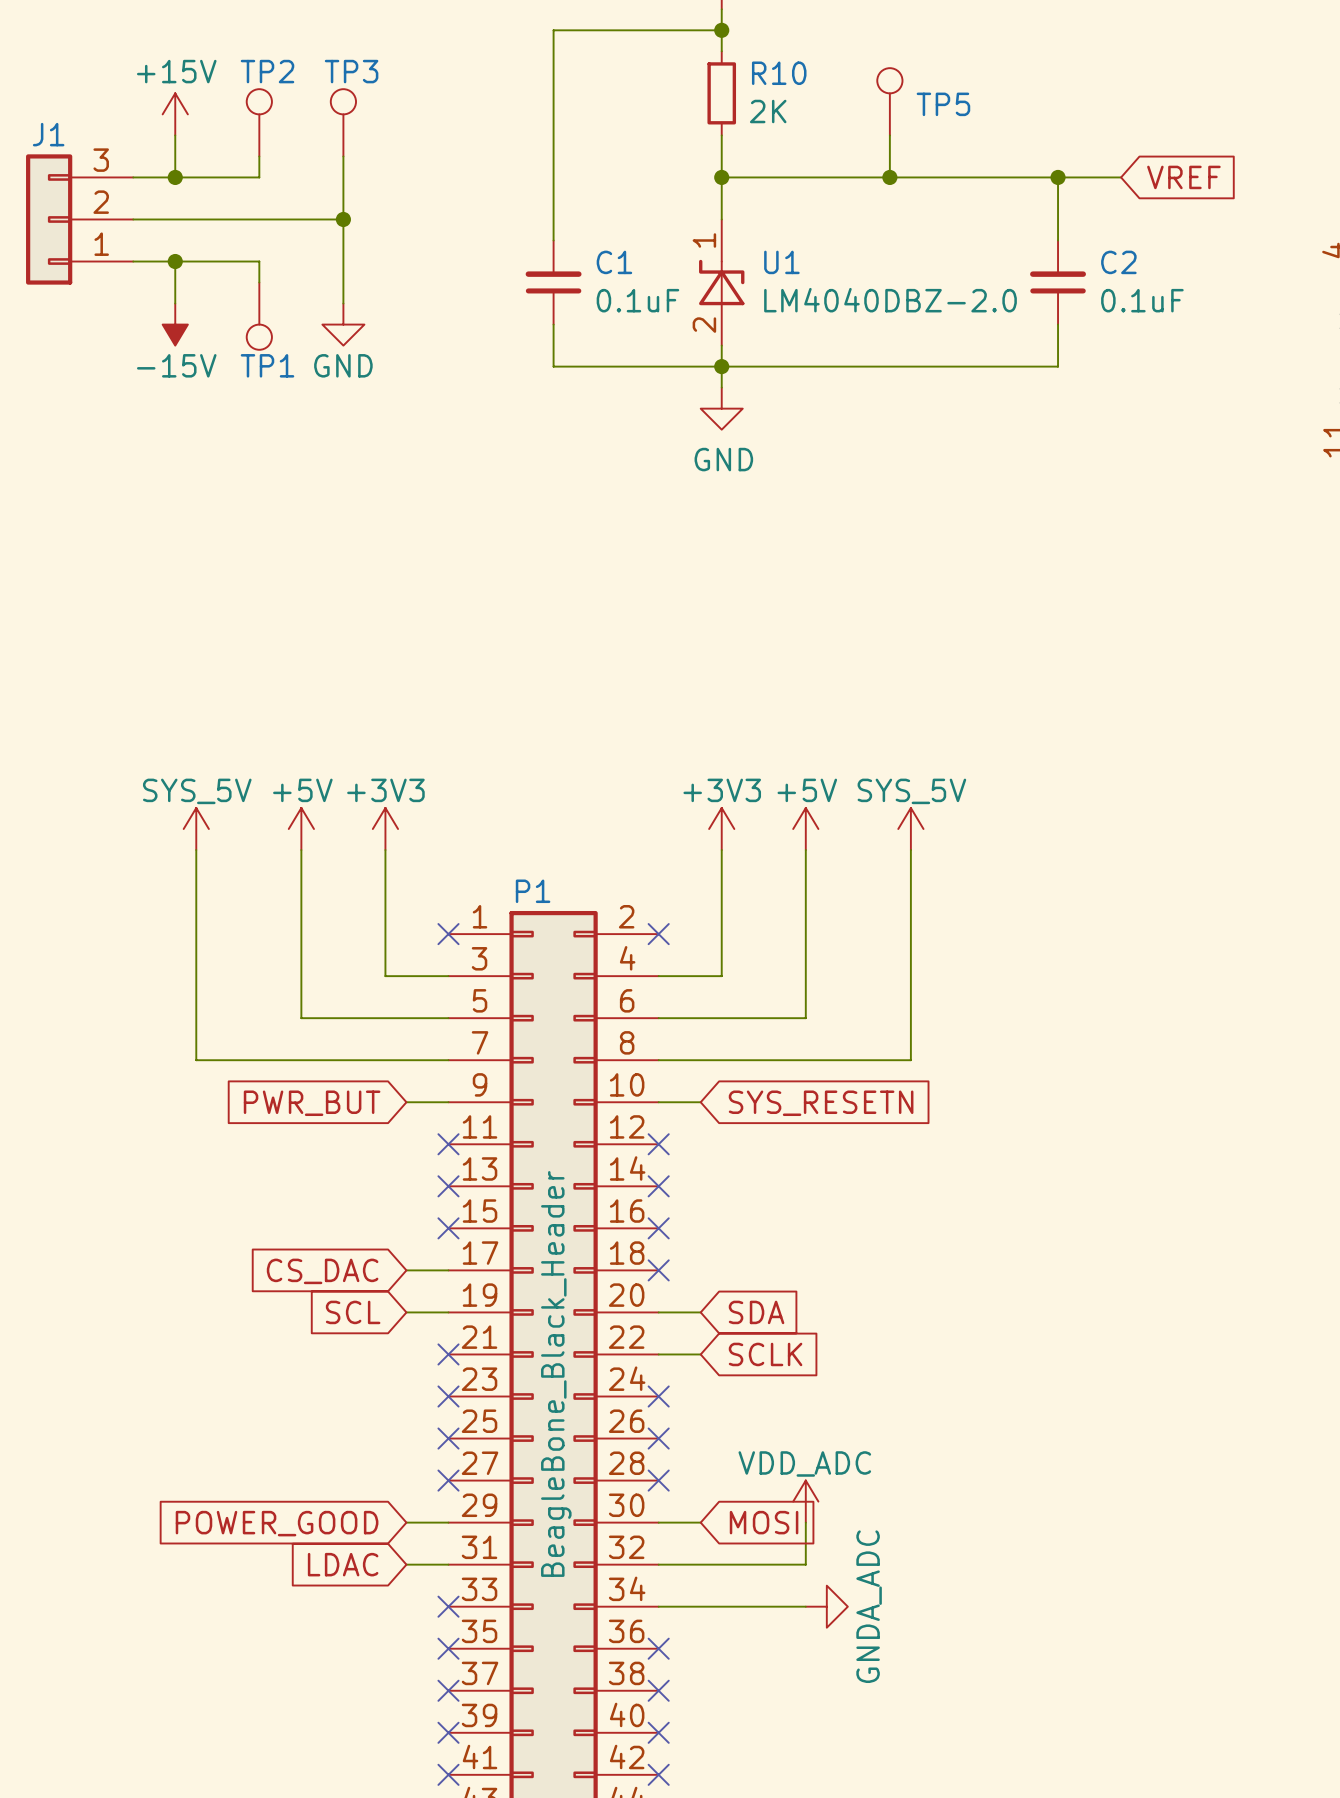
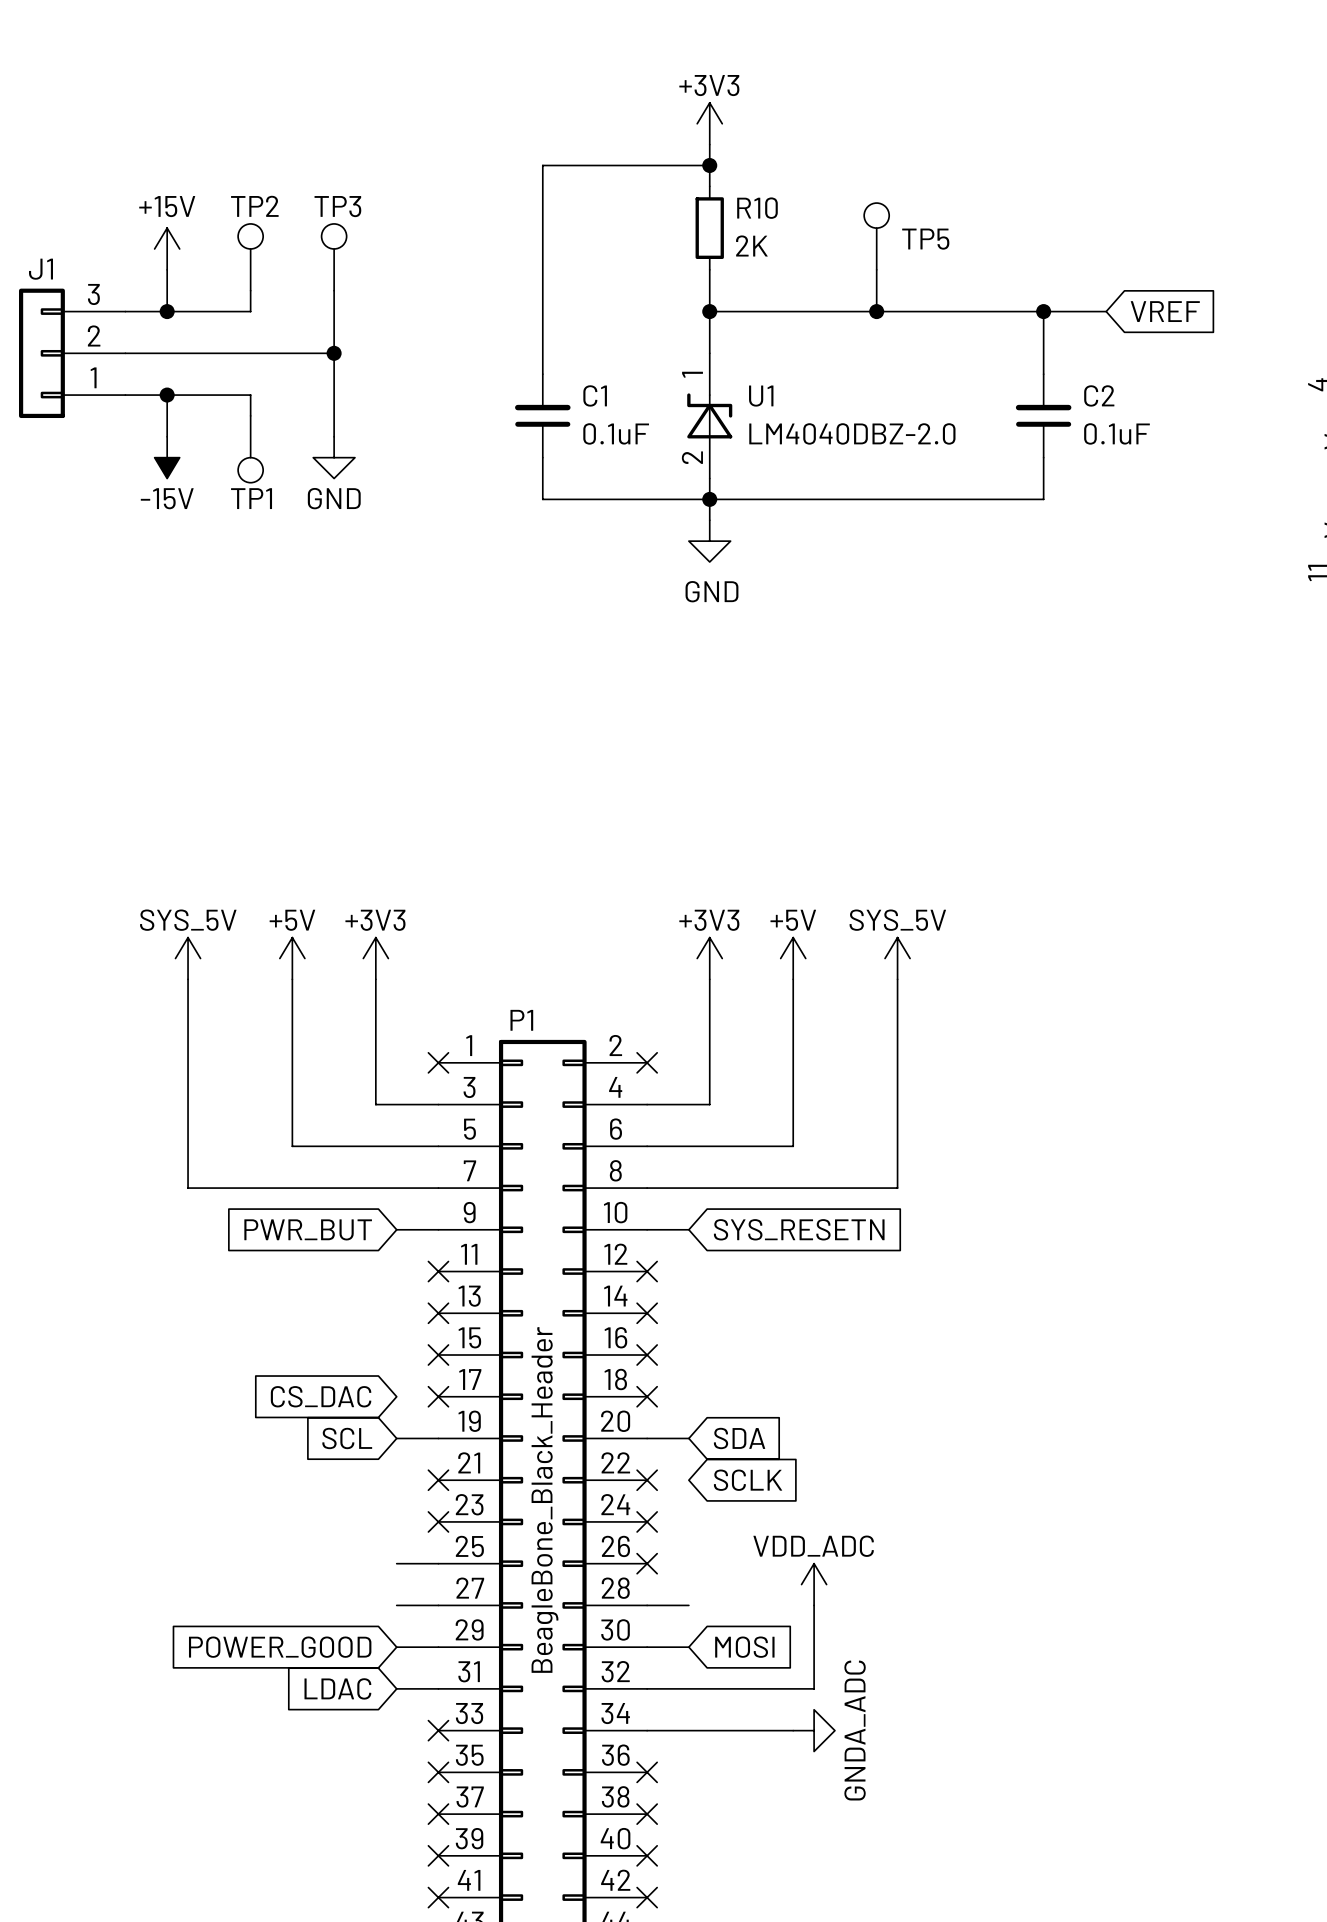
wire: (406, 1270) (448, 1270) -> (396, 1563) (438, 1563)
no-connect mark: none -> (438, 1396)
wire: (658, 1354) (700, 1354) -> (647, 1605) (688, 1605)
no-connect mark: none -> (647, 1480)
no-connect mark: (448, 1438) -> none
wire: none -> (396, 1605) (438, 1605)
no-connect mark: (448, 1480) -> none
no-connect mark: (658, 1480) -> none
power symbol position: VDD_ADC (805, 1501) -> VDD_ADC (814, 1584)
wire: (805, 1522) (805, 1564) -> (814, 1605) (814, 1688) (793, 1688)

